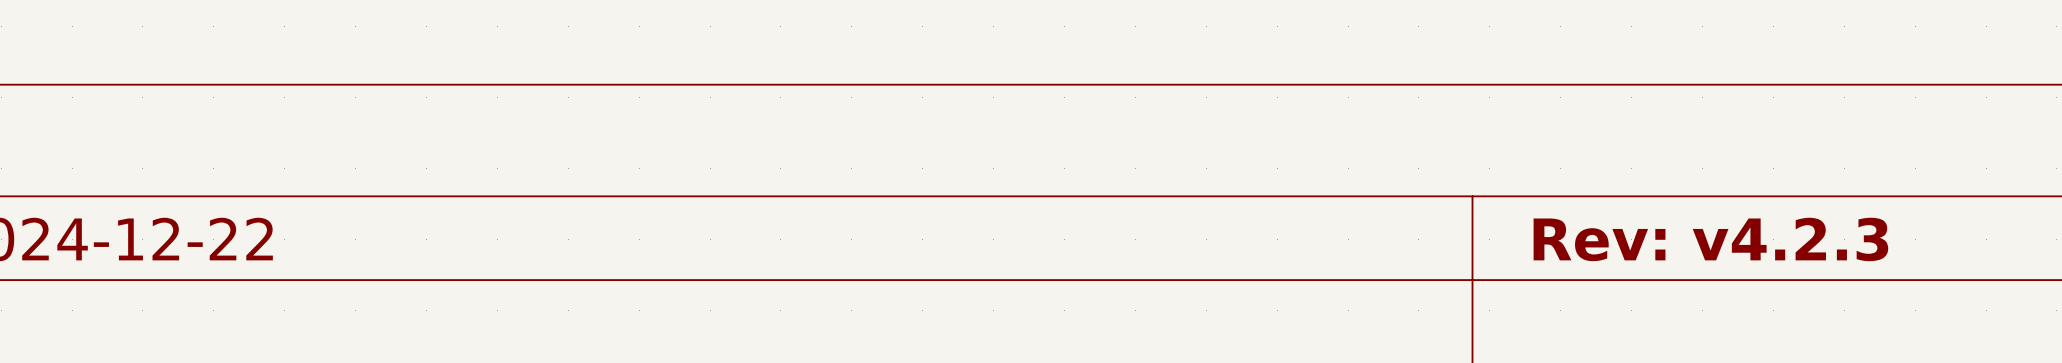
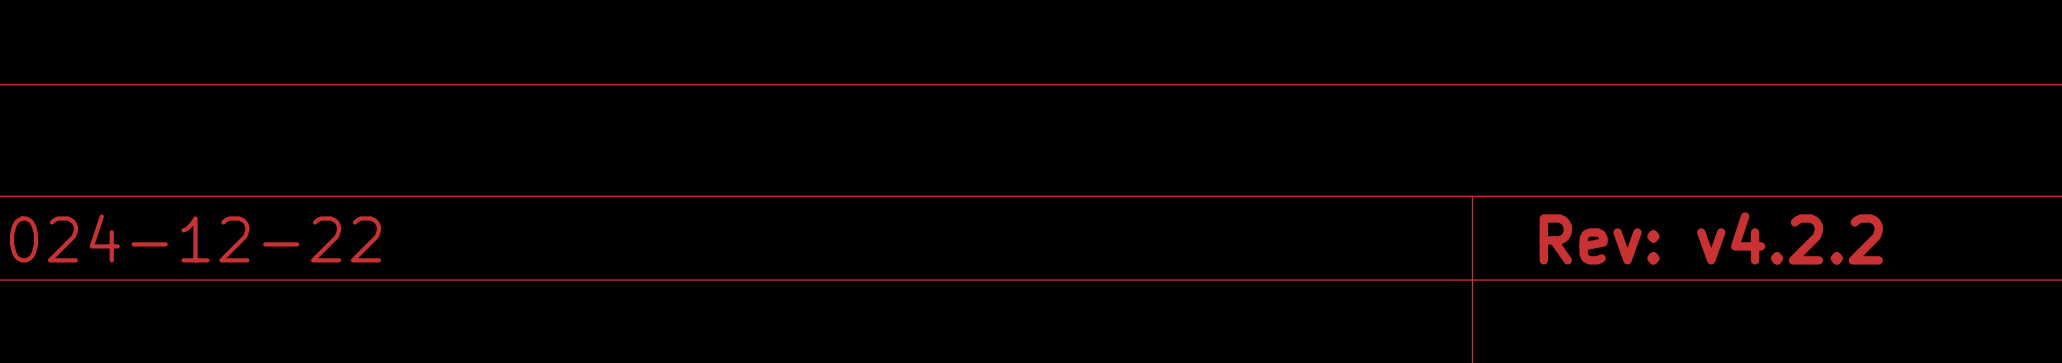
title block: Rev: v4.2.3 (1710, 239) -> Rev: v4.2.2 (1711, 238)

